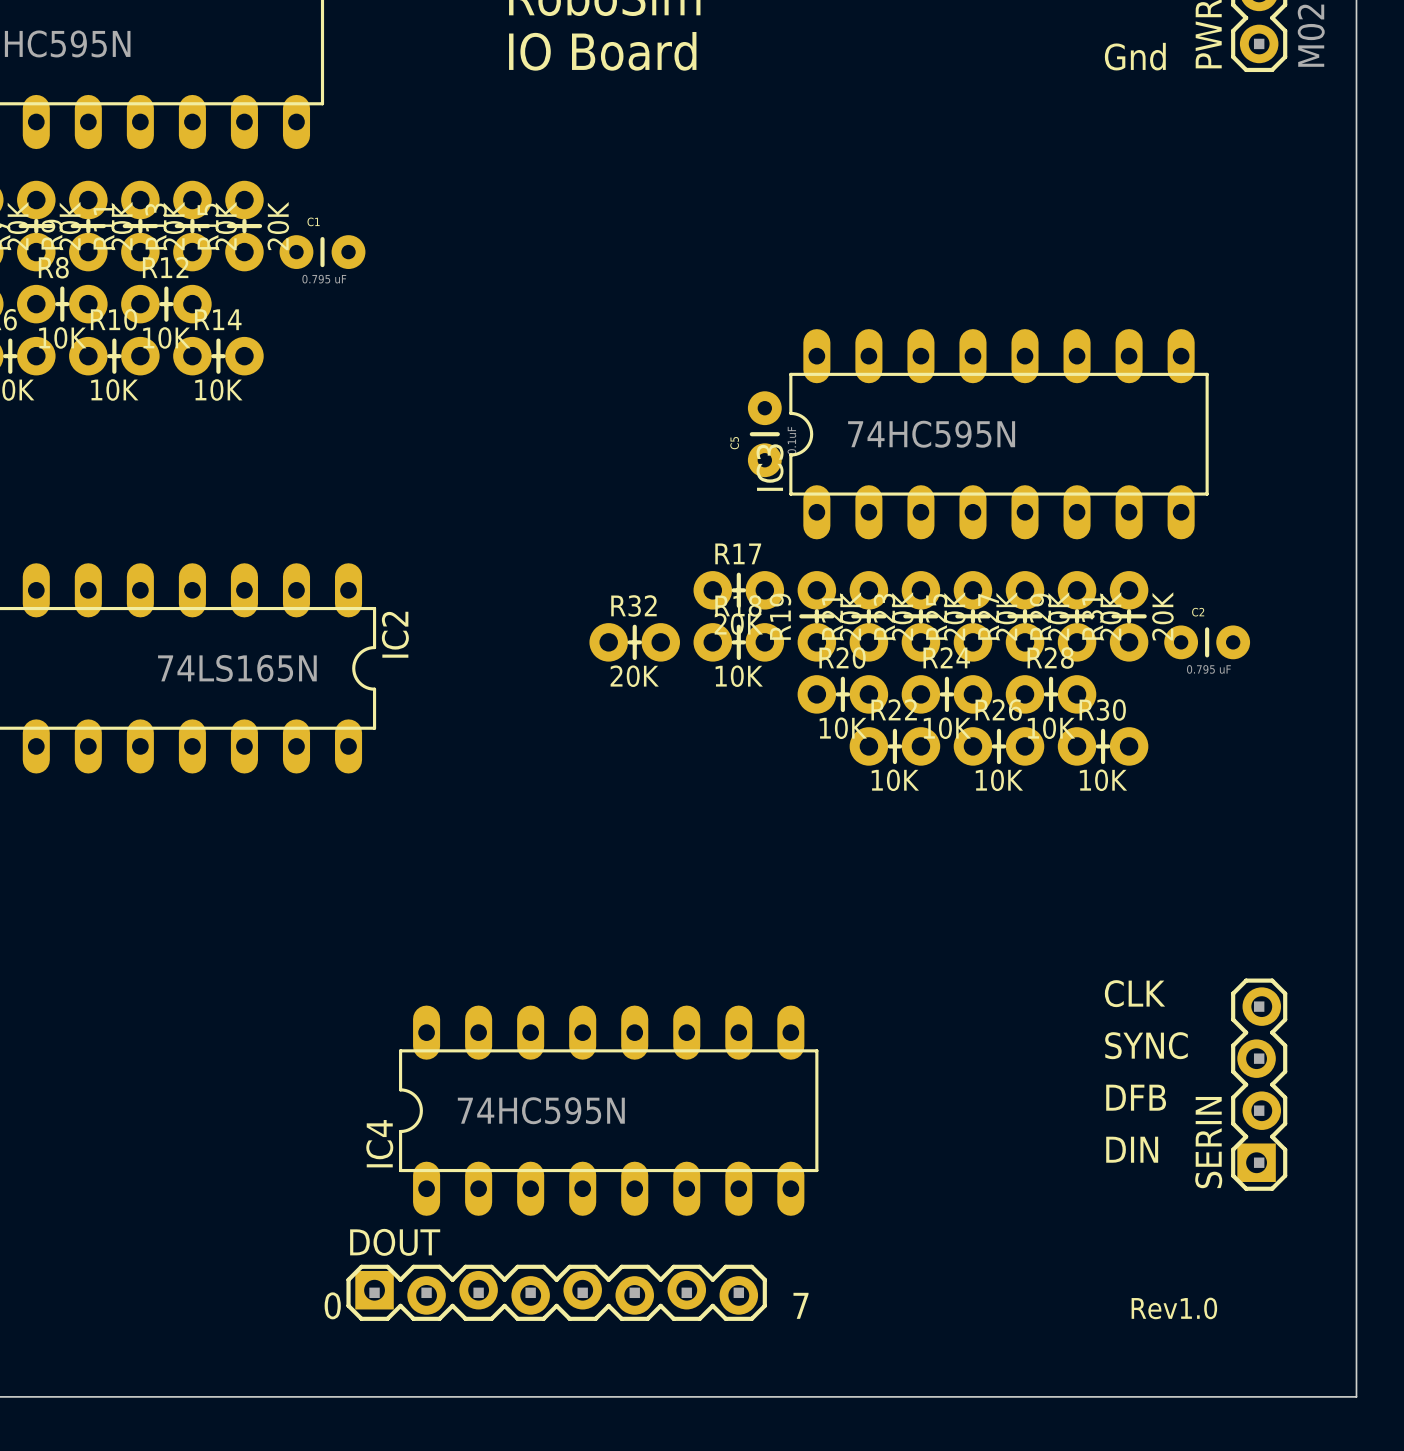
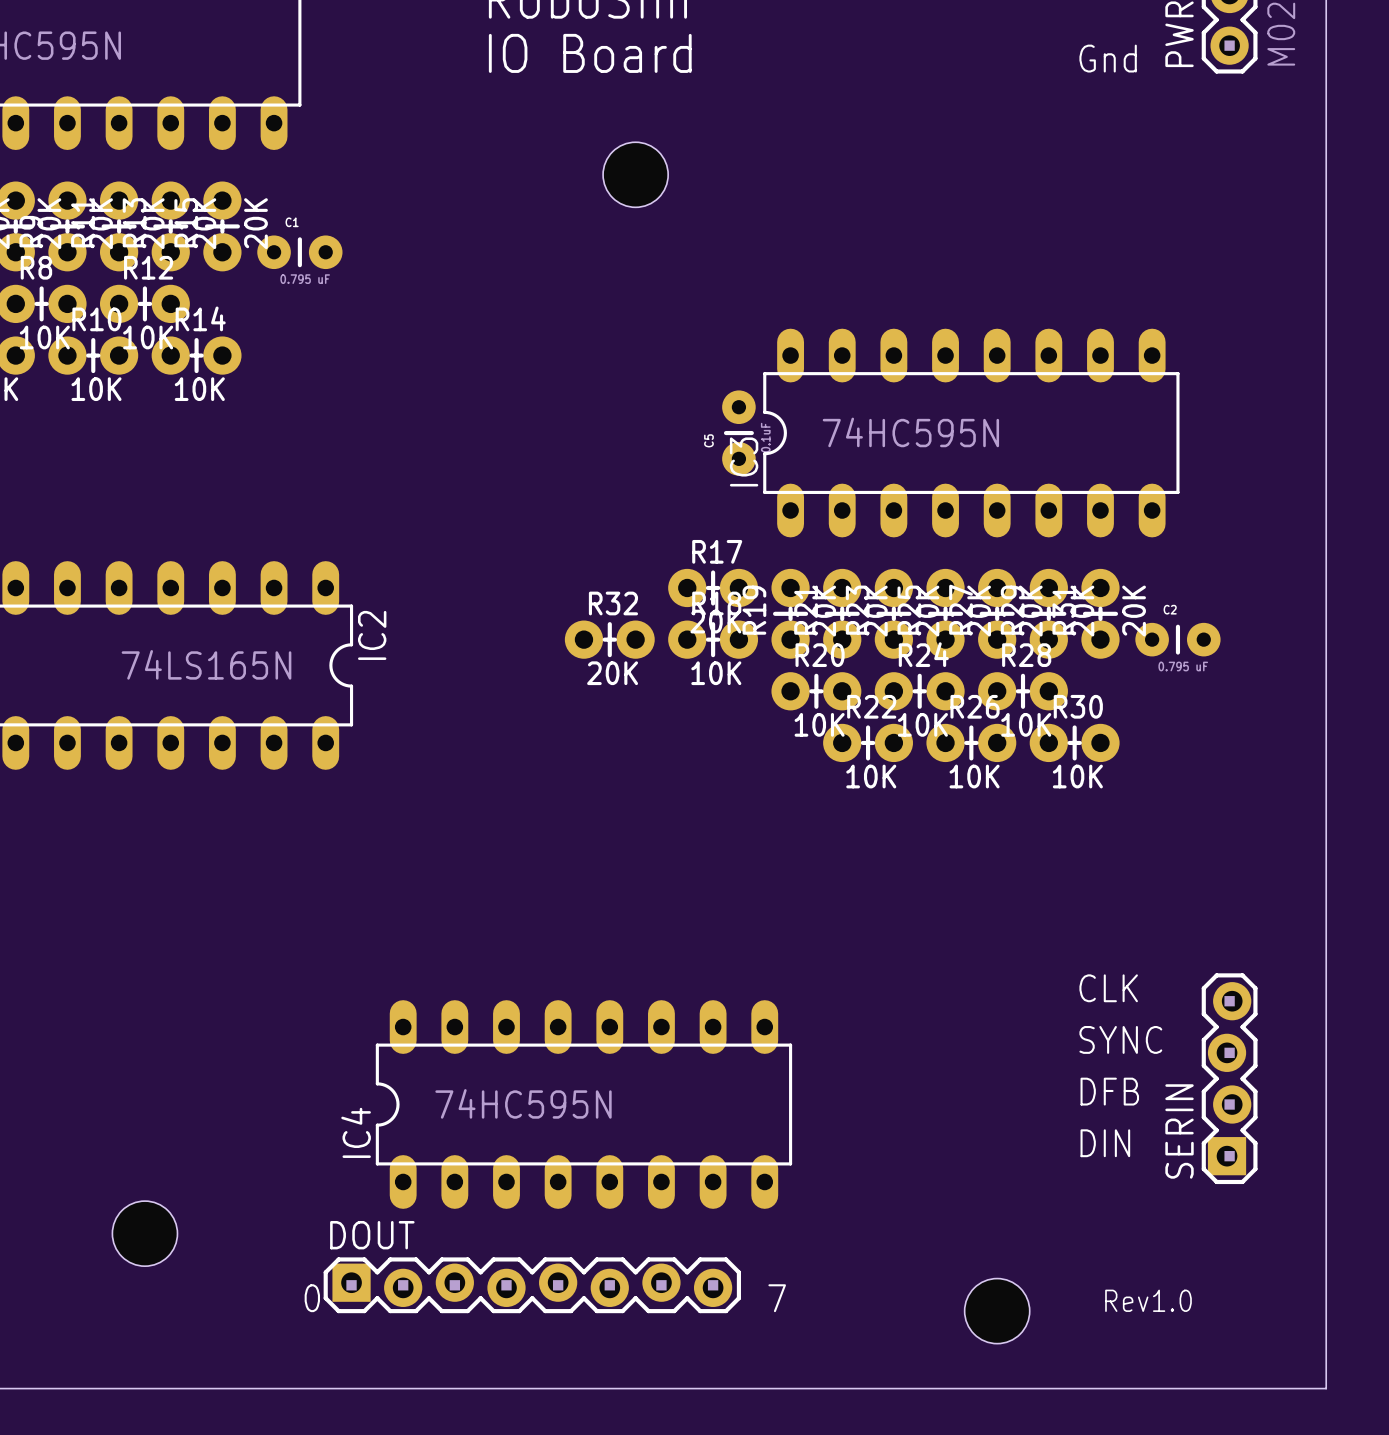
hole: none -> (635, 174)
hole: none -> (144, 1233)
hole: none -> (997, 1311)

